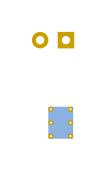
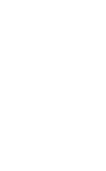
part: (53, 40) -> none
part: (60, 122) -> none

